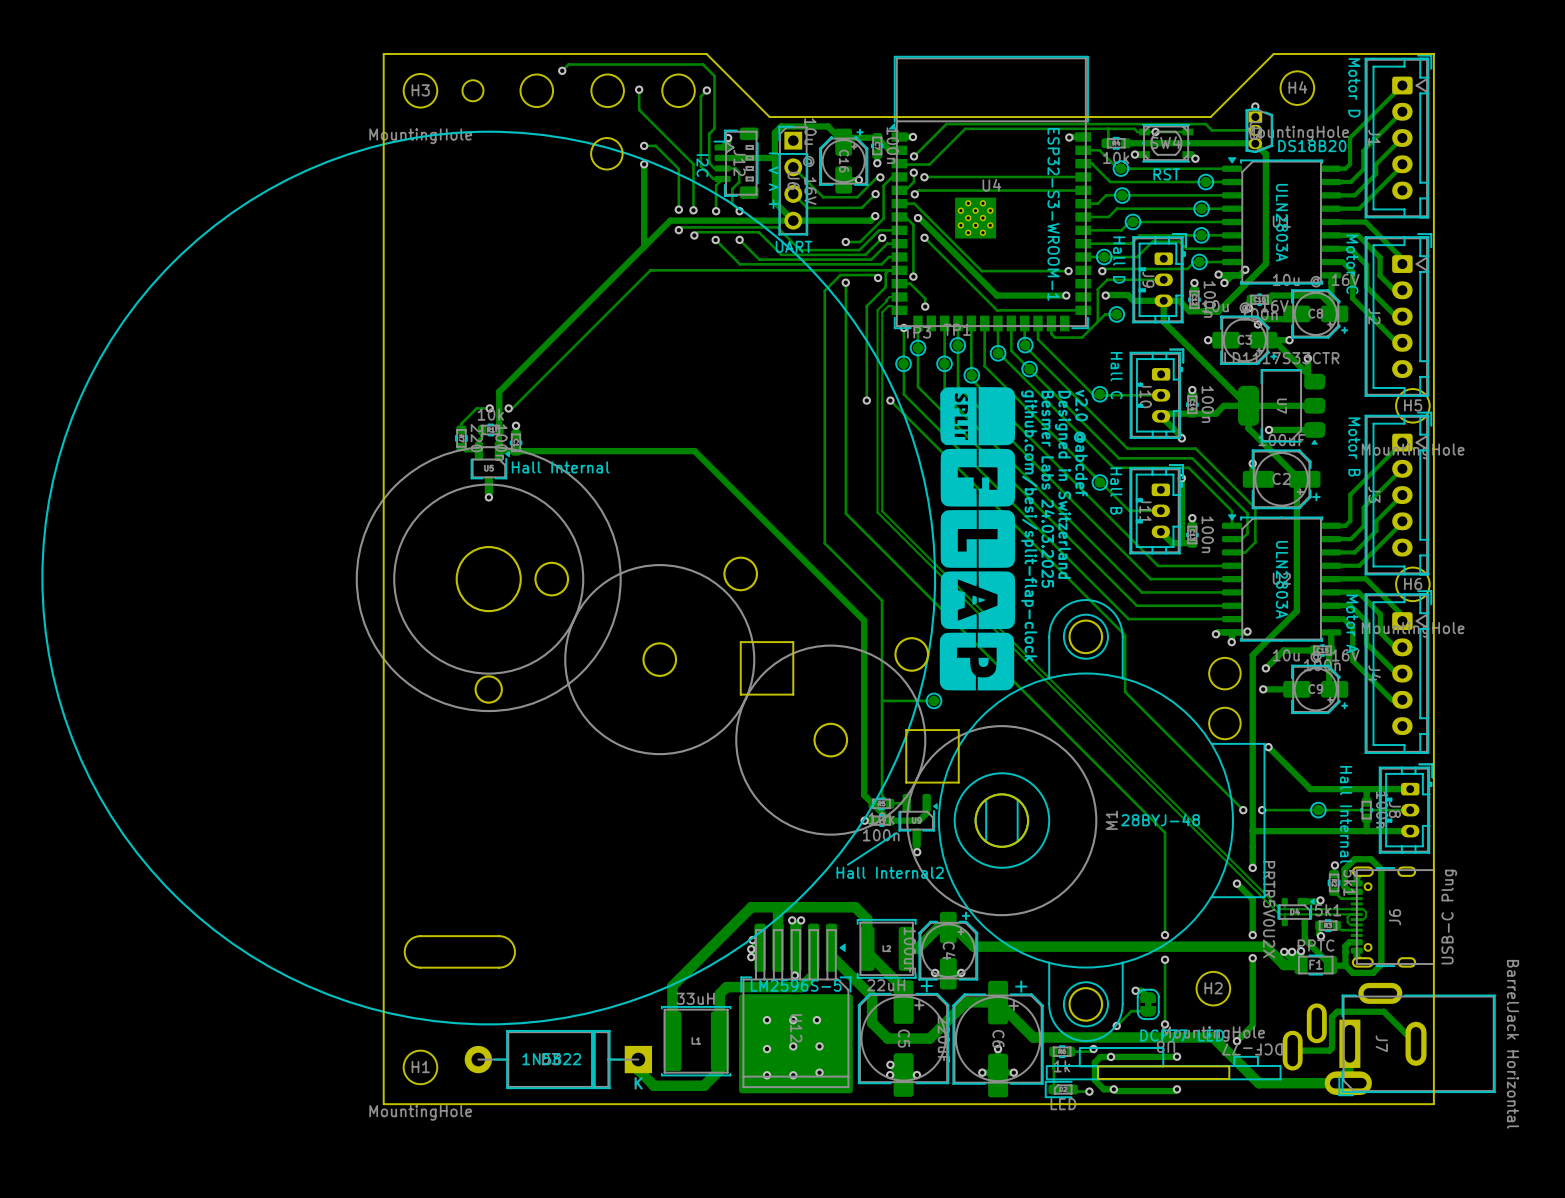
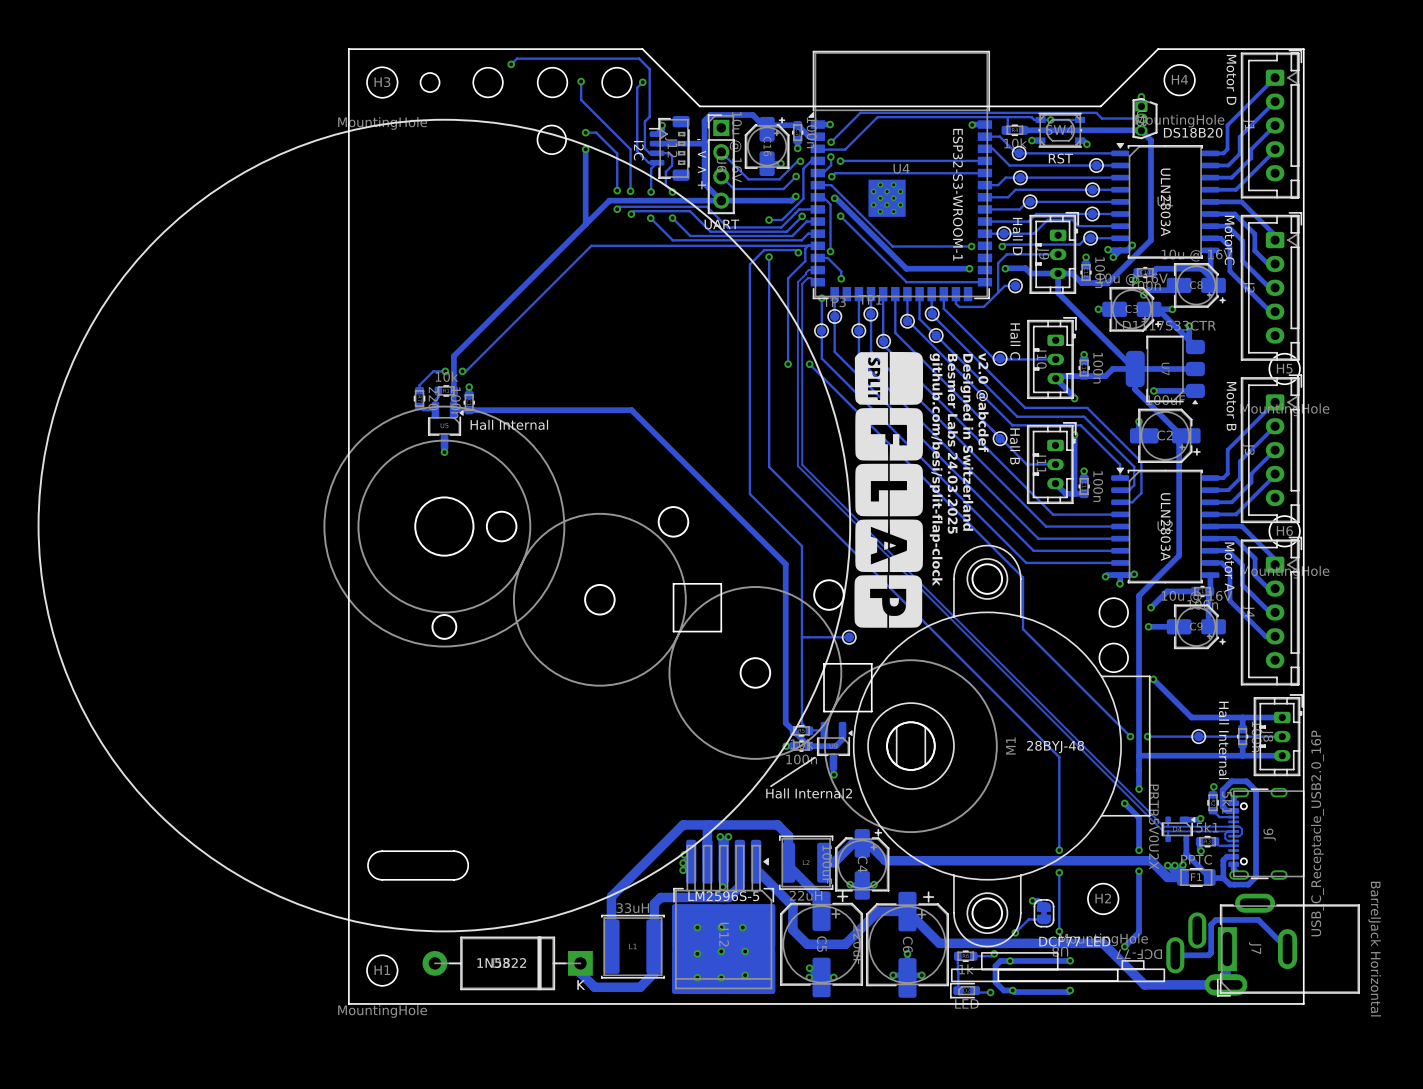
J6 value: USB-C Plug (1449, 917) -> USB_C_Receptacle_USB2.0_16P (1317, 833)

